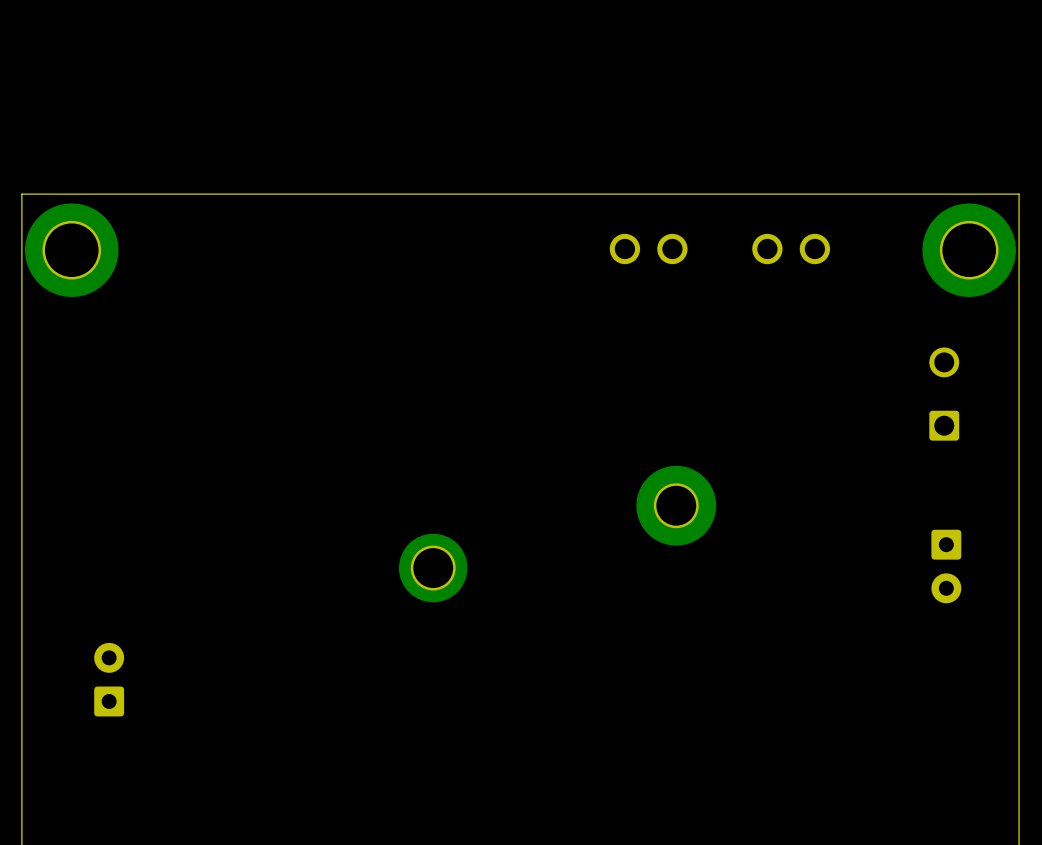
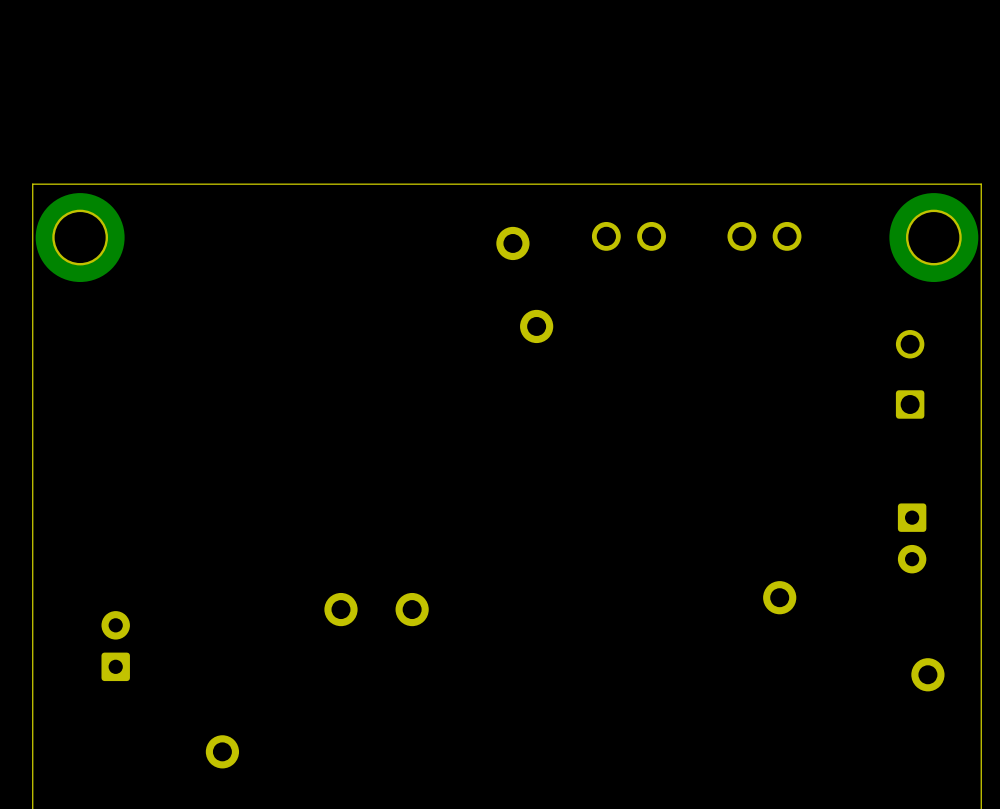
part: none -> (512, 243)
part: none -> (536, 326)
part: (676, 505) -> none
part: (433, 568) -> none
part: none -> (779, 597)
part: none -> (340, 609)
part: none -> (412, 609)
part: none -> (927, 674)
part: none -> (222, 751)

